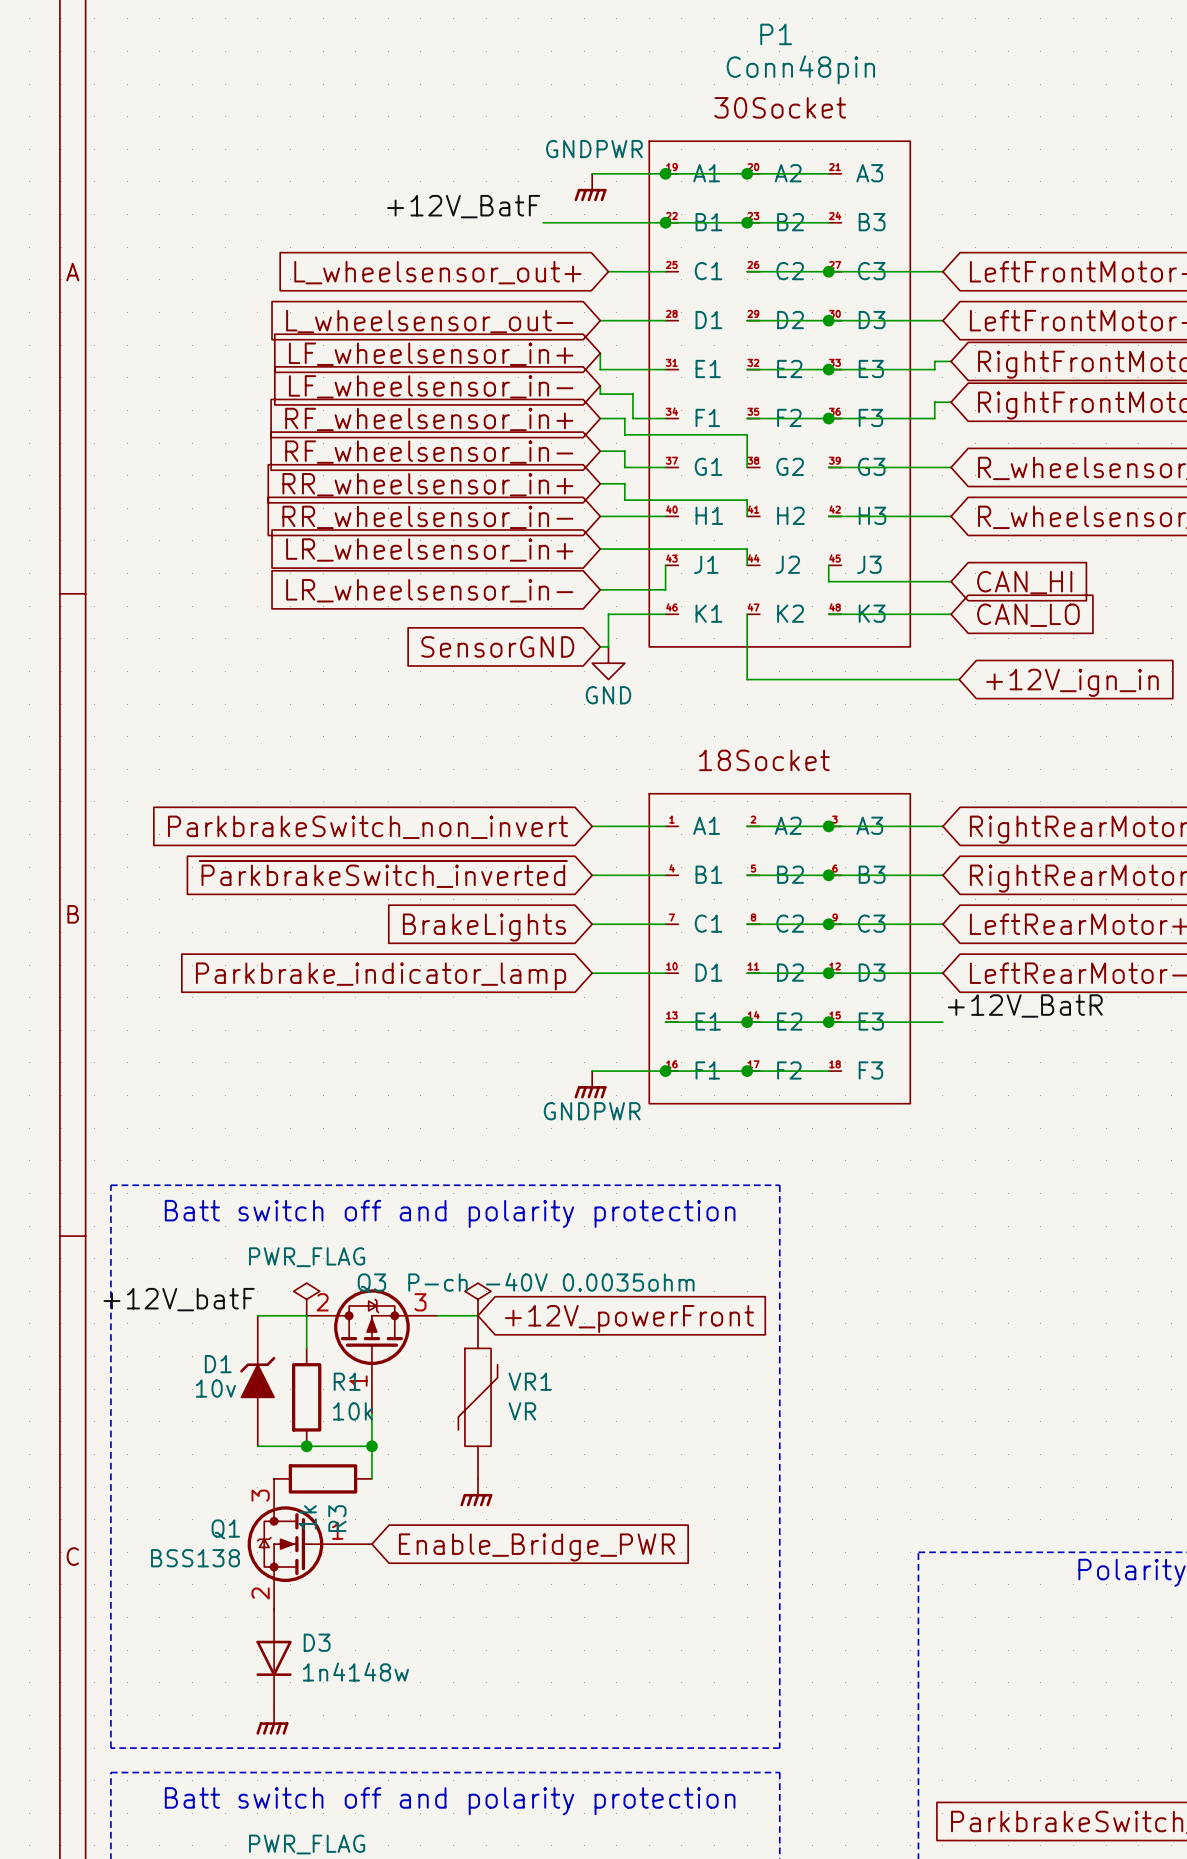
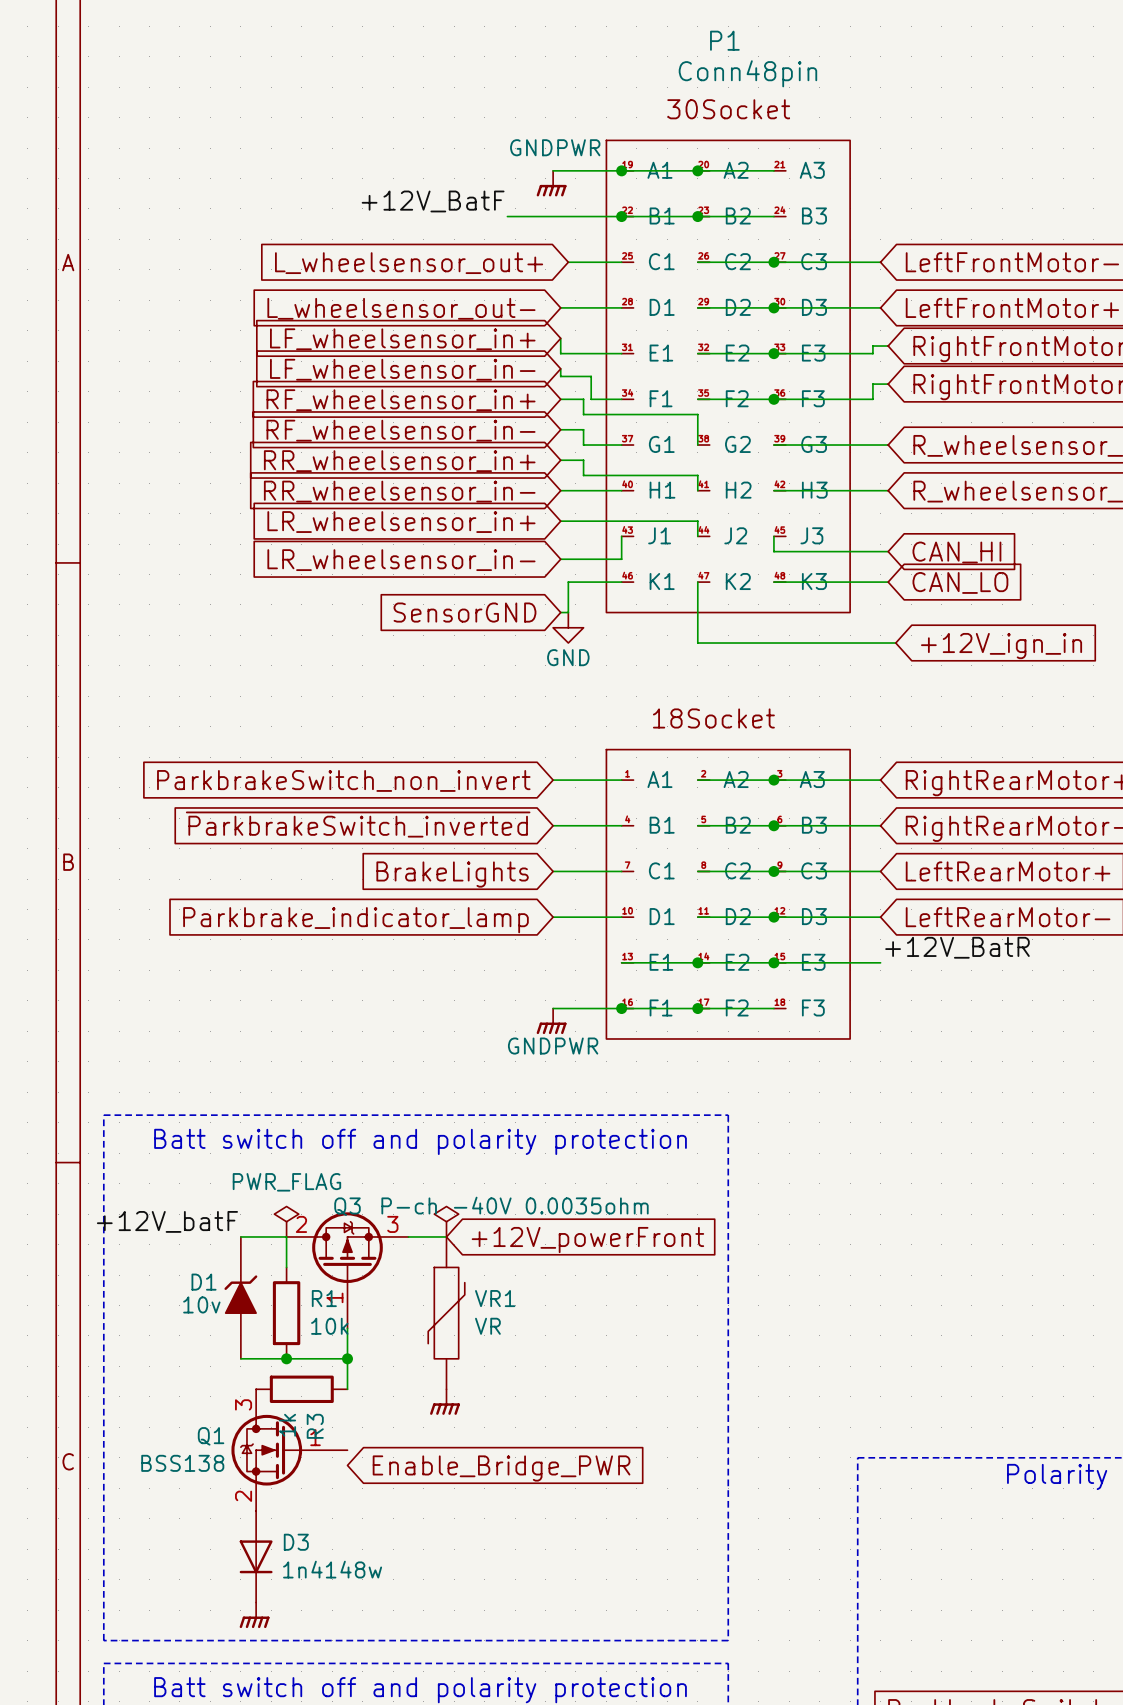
global label position: Enable_Bridge_PWR (536, 1547) -> Enable_Bridge_PWR (501, 1468)

